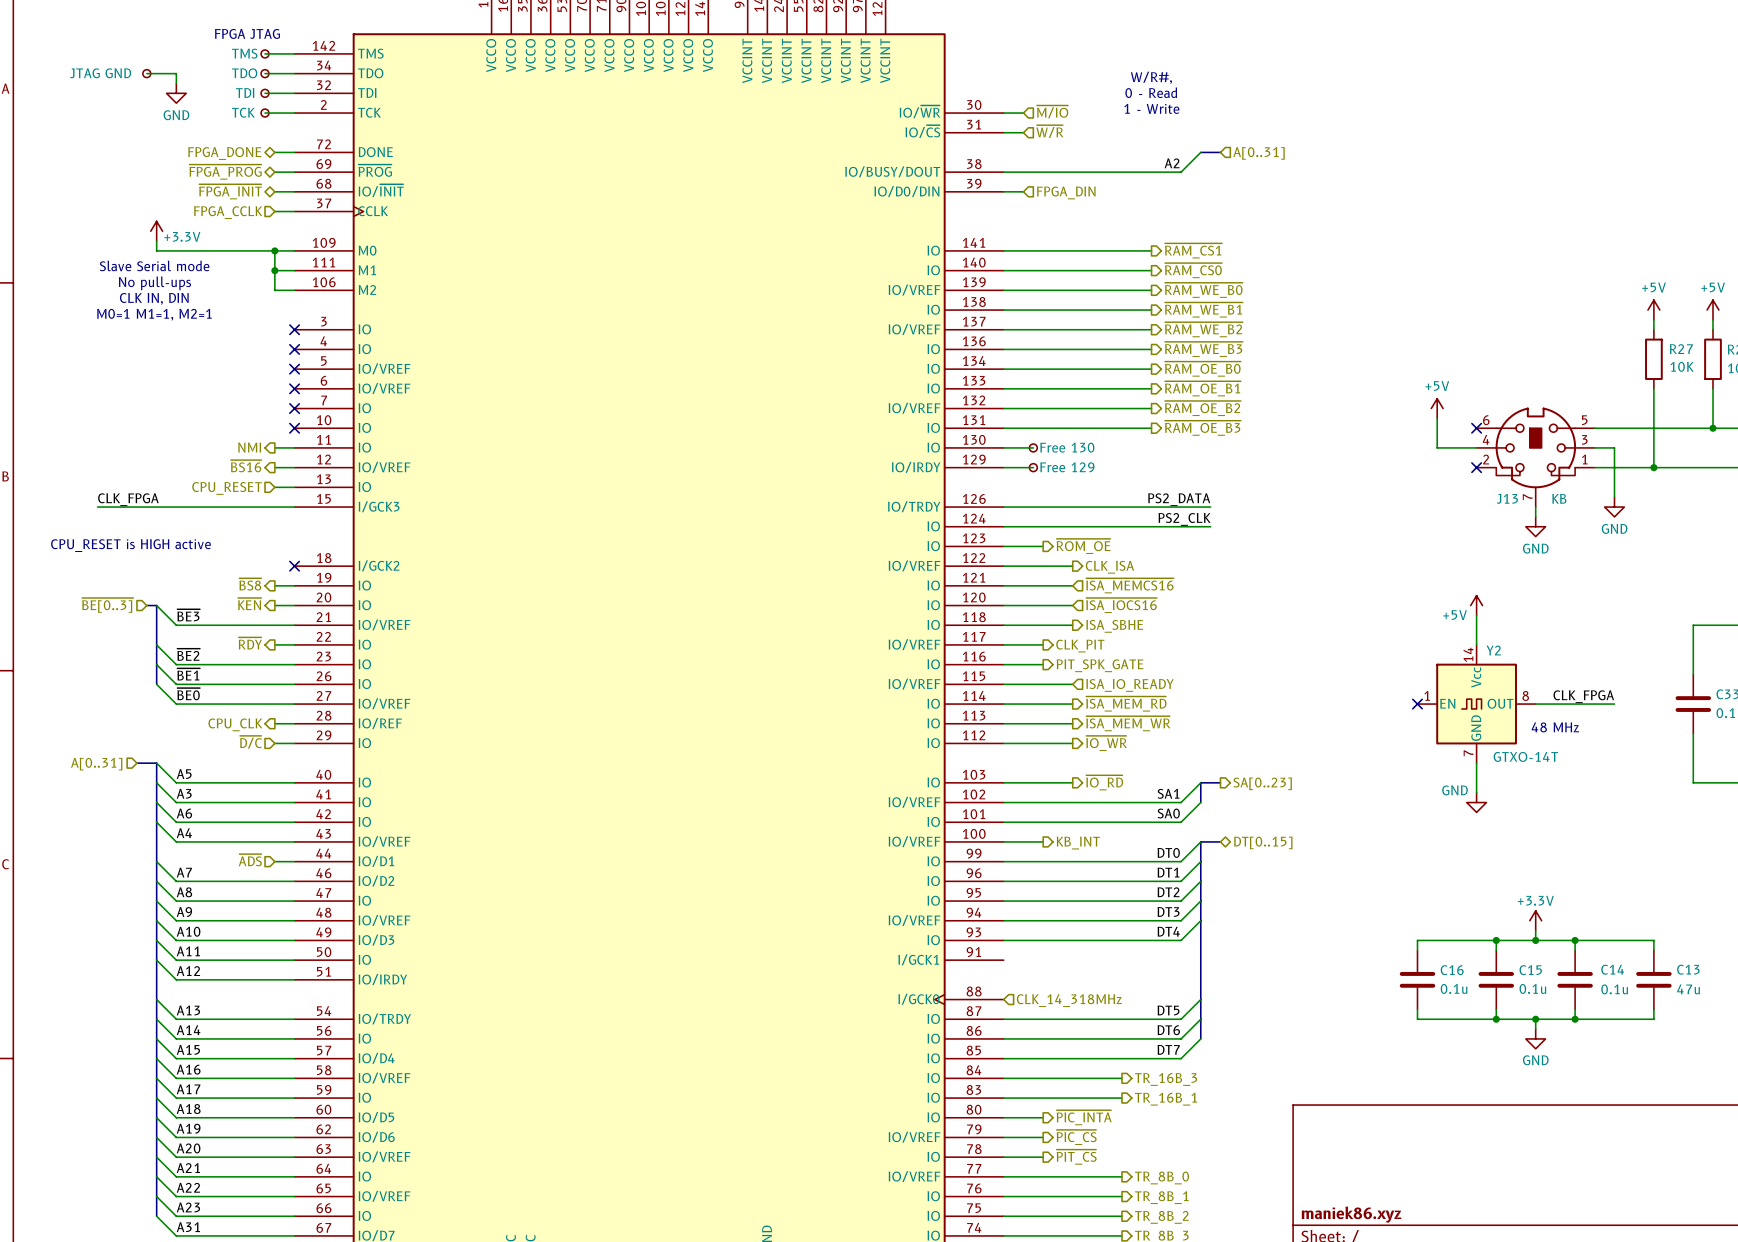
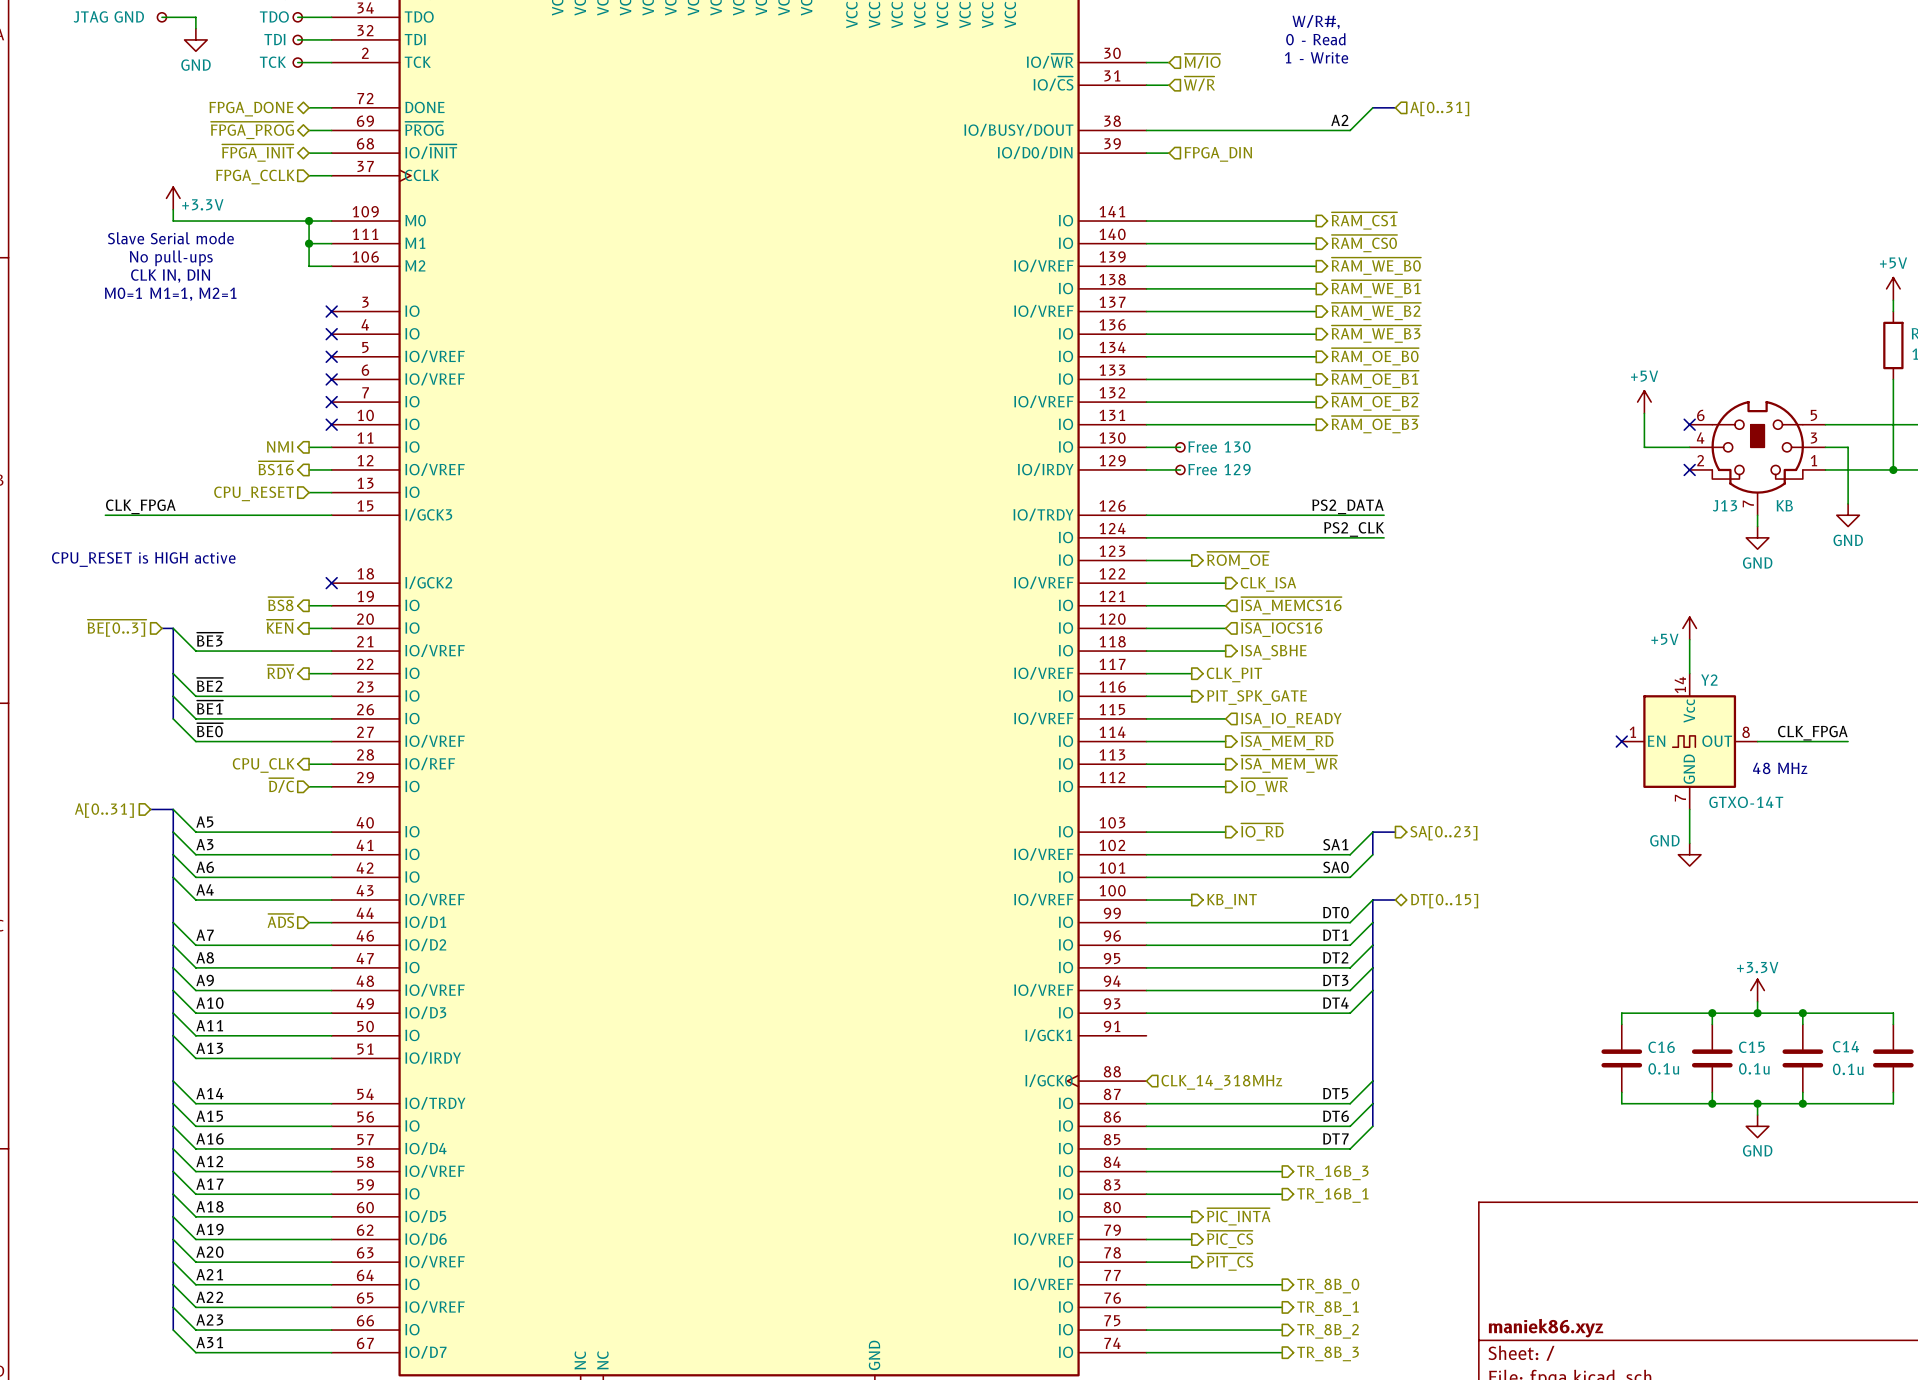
label: A12 (188, 971) -> A13 (209, 1048)
label: A13 (188, 1010) -> A14 (209, 1093)
label: A14 (188, 1030) -> A15 (209, 1116)
label: A15 (188, 1049) -> A16 (209, 1138)
label: A16 (188, 1069) -> A12 (209, 1161)

